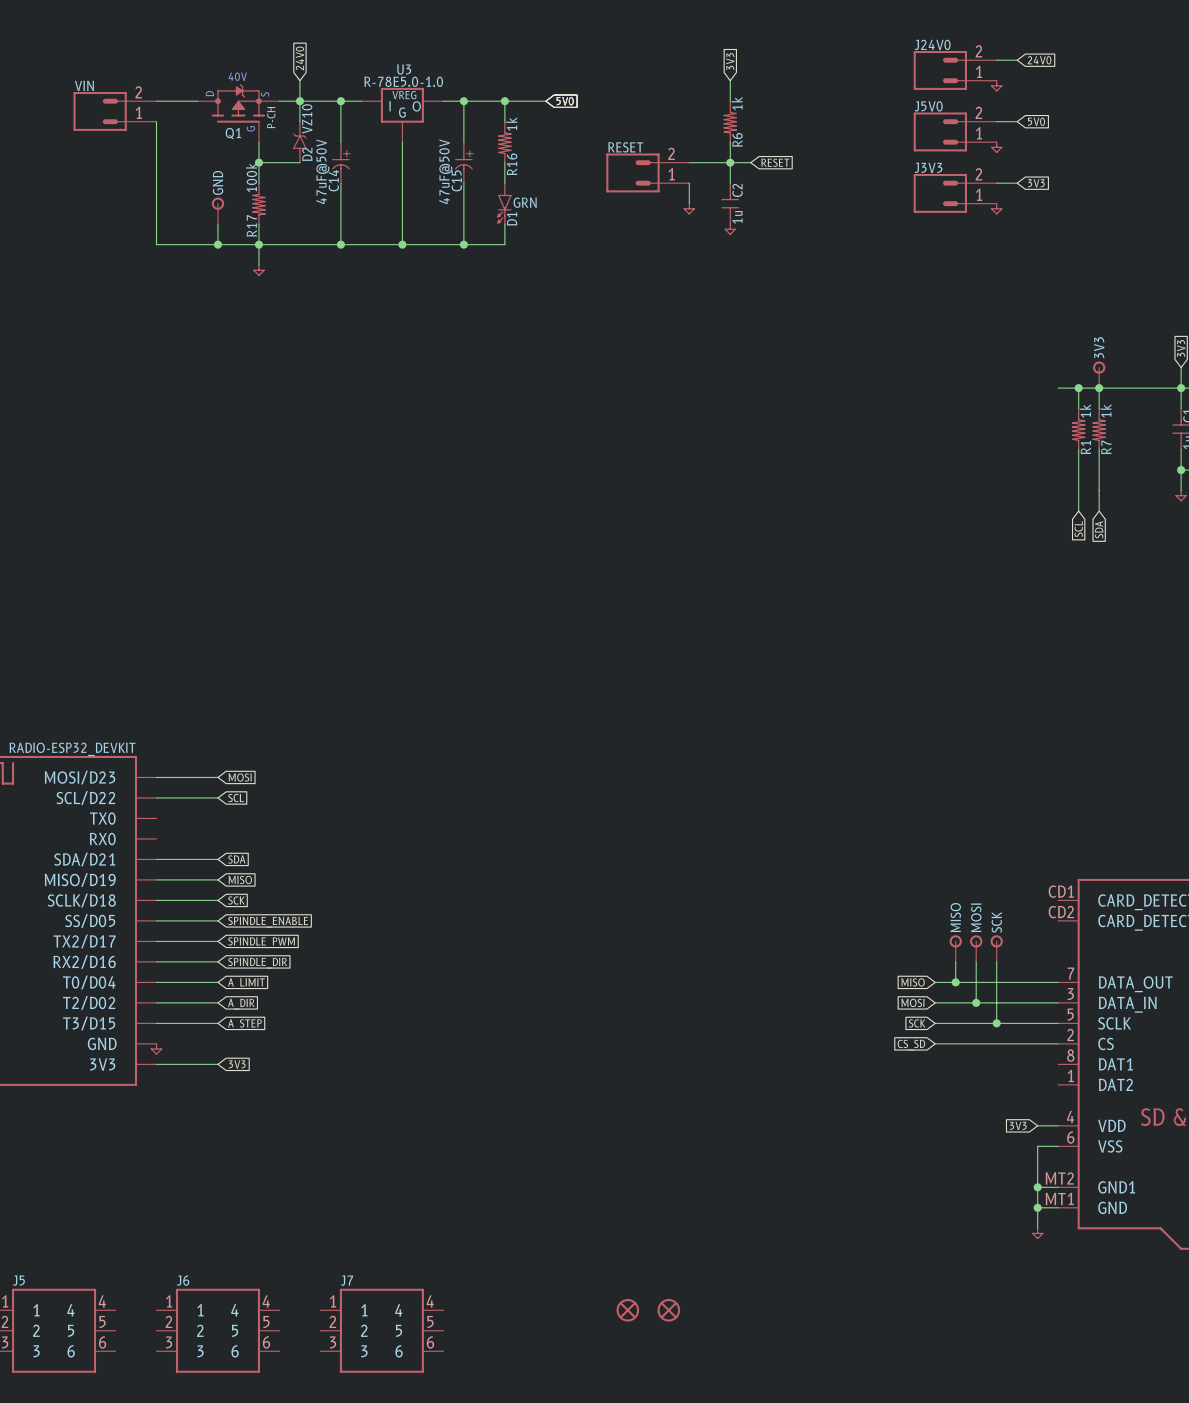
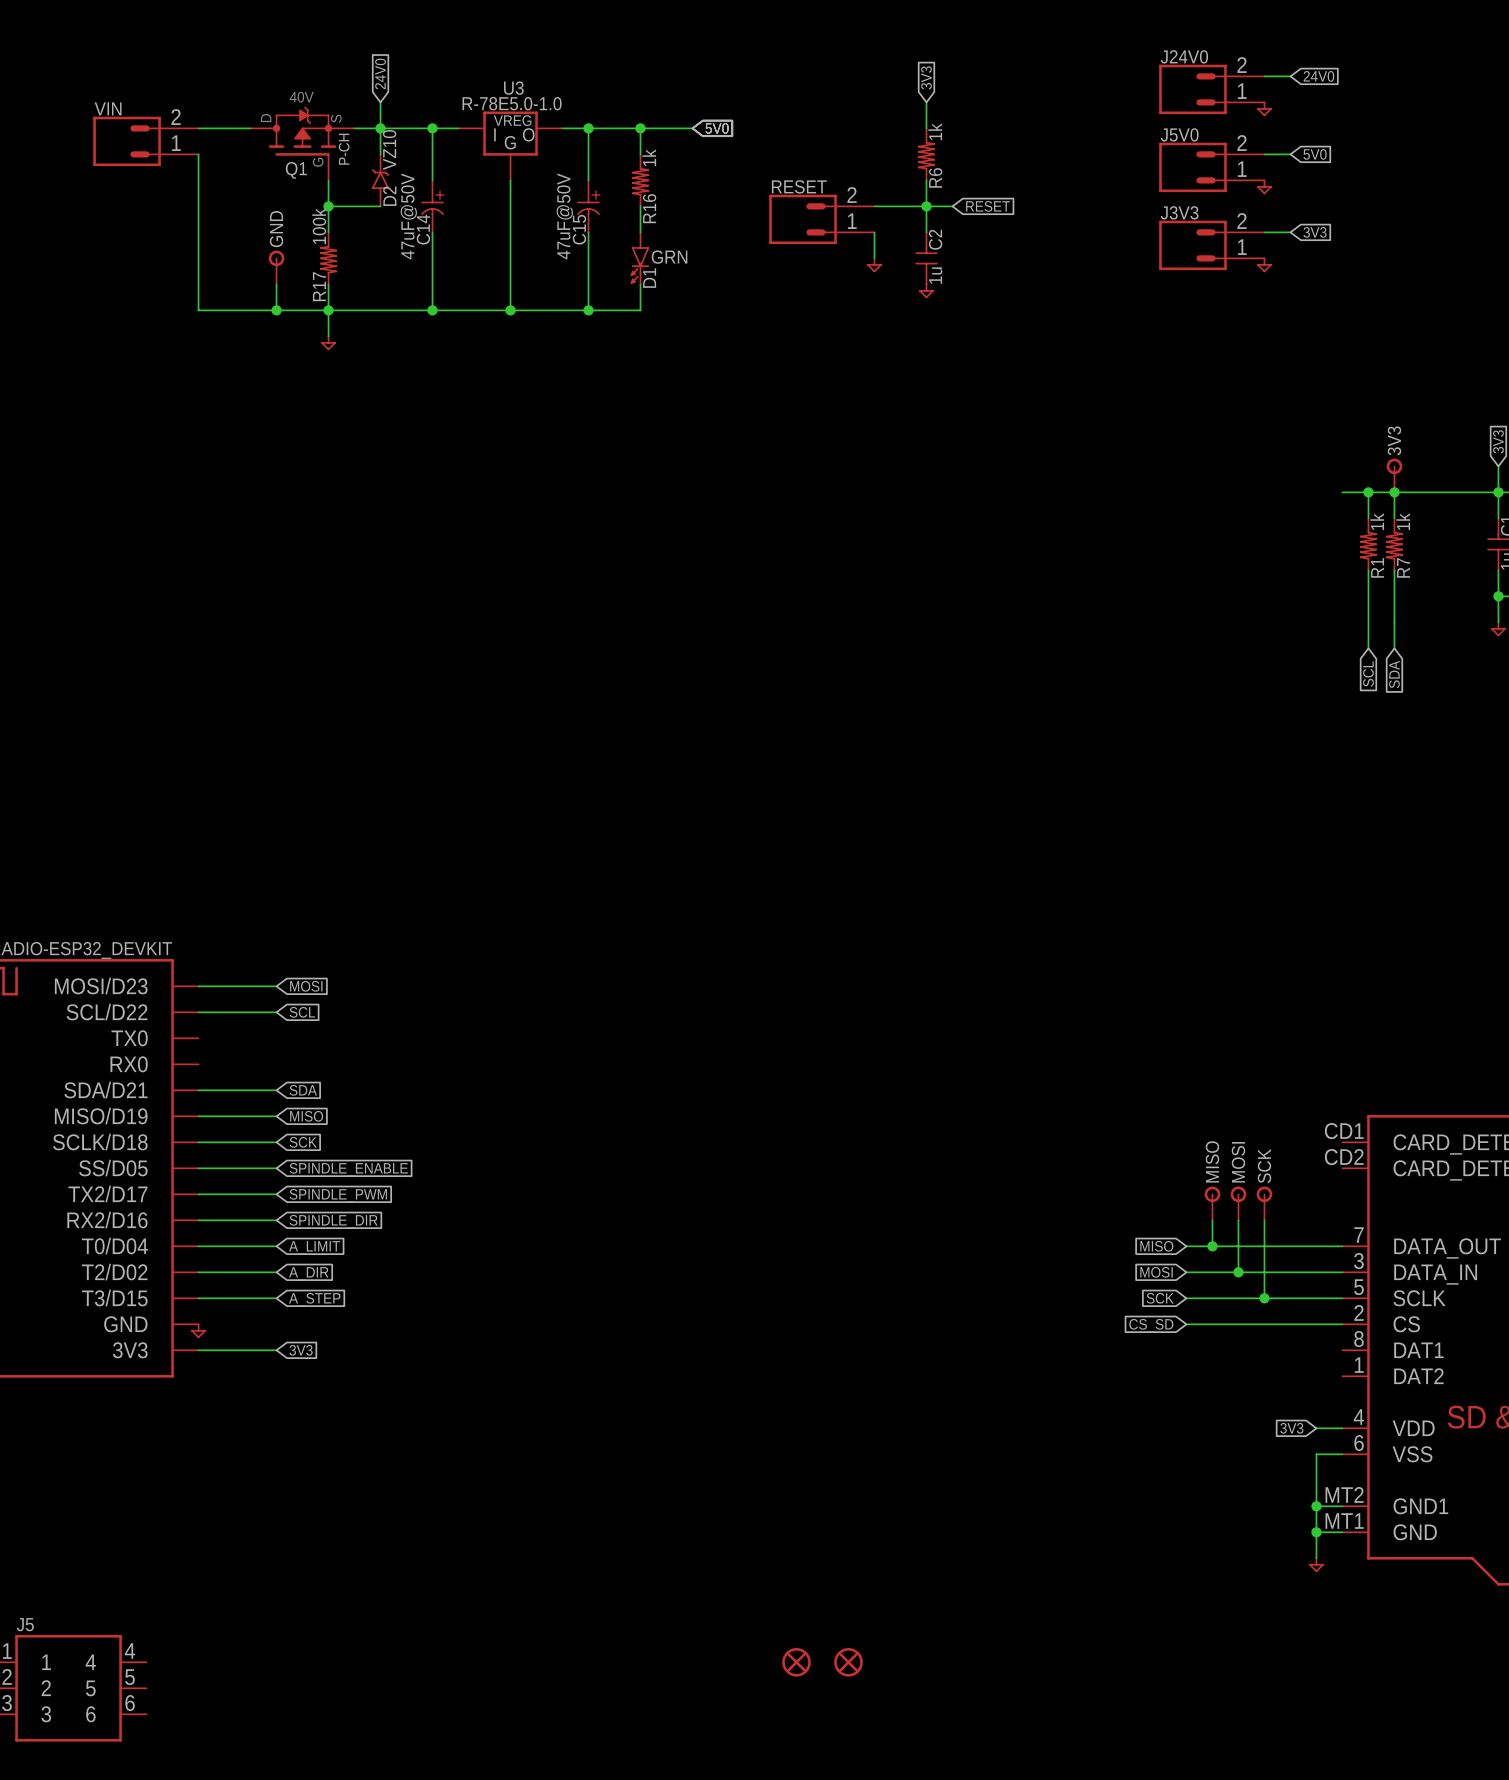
J6: (217, 1330) -> none
J7: (381, 1330) -> none

